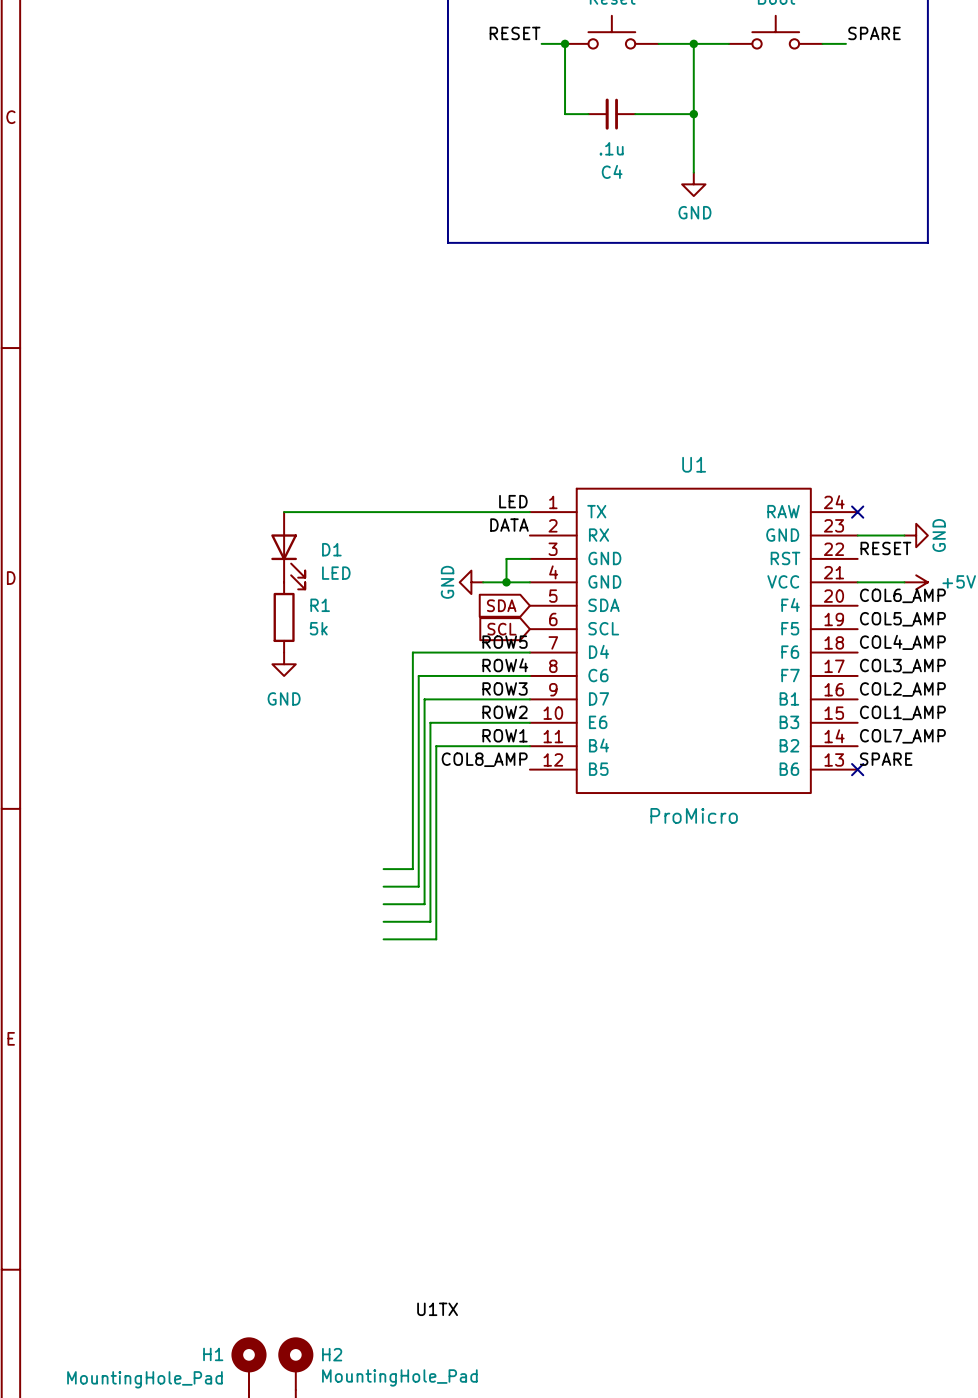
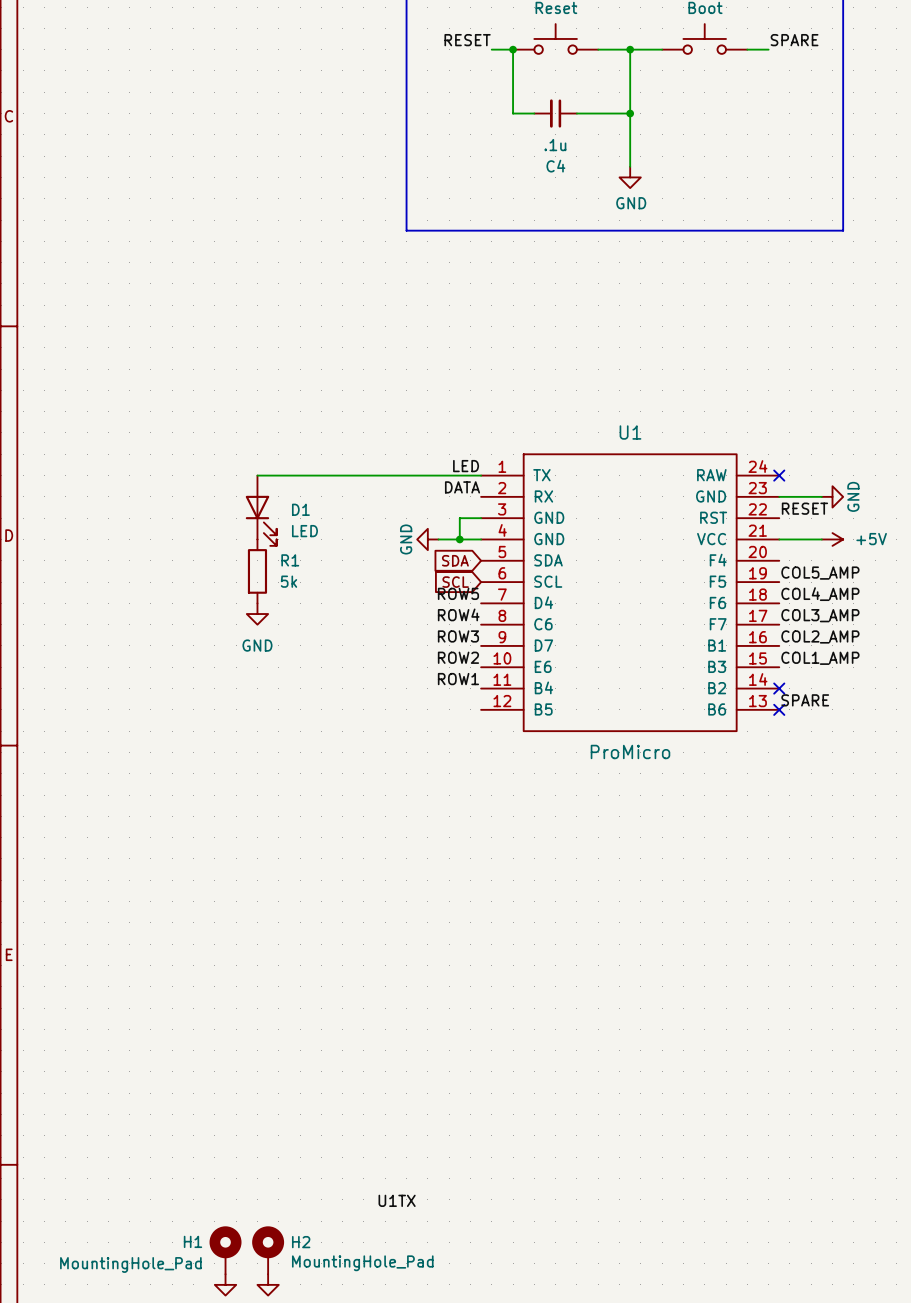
label: COL6_AMP (902, 595) -> none
wire: (529, 652) (412, 652) (412, 869) (383, 869) -> none
wire: (529, 675) (418, 675) (418, 886) (383, 886) -> none
wire: (529, 699) (424, 699) (424, 904) (383, 904) -> none
wire: (529, 722) (430, 722) (430, 921) (383, 921) -> none
label: COL7_AMP (902, 736) -> none
wire: (529, 746) (436, 746) (436, 939) (383, 939) -> none
no-connect mark: none -> (779, 688)
label: COL8_AMP (484, 759) -> none

